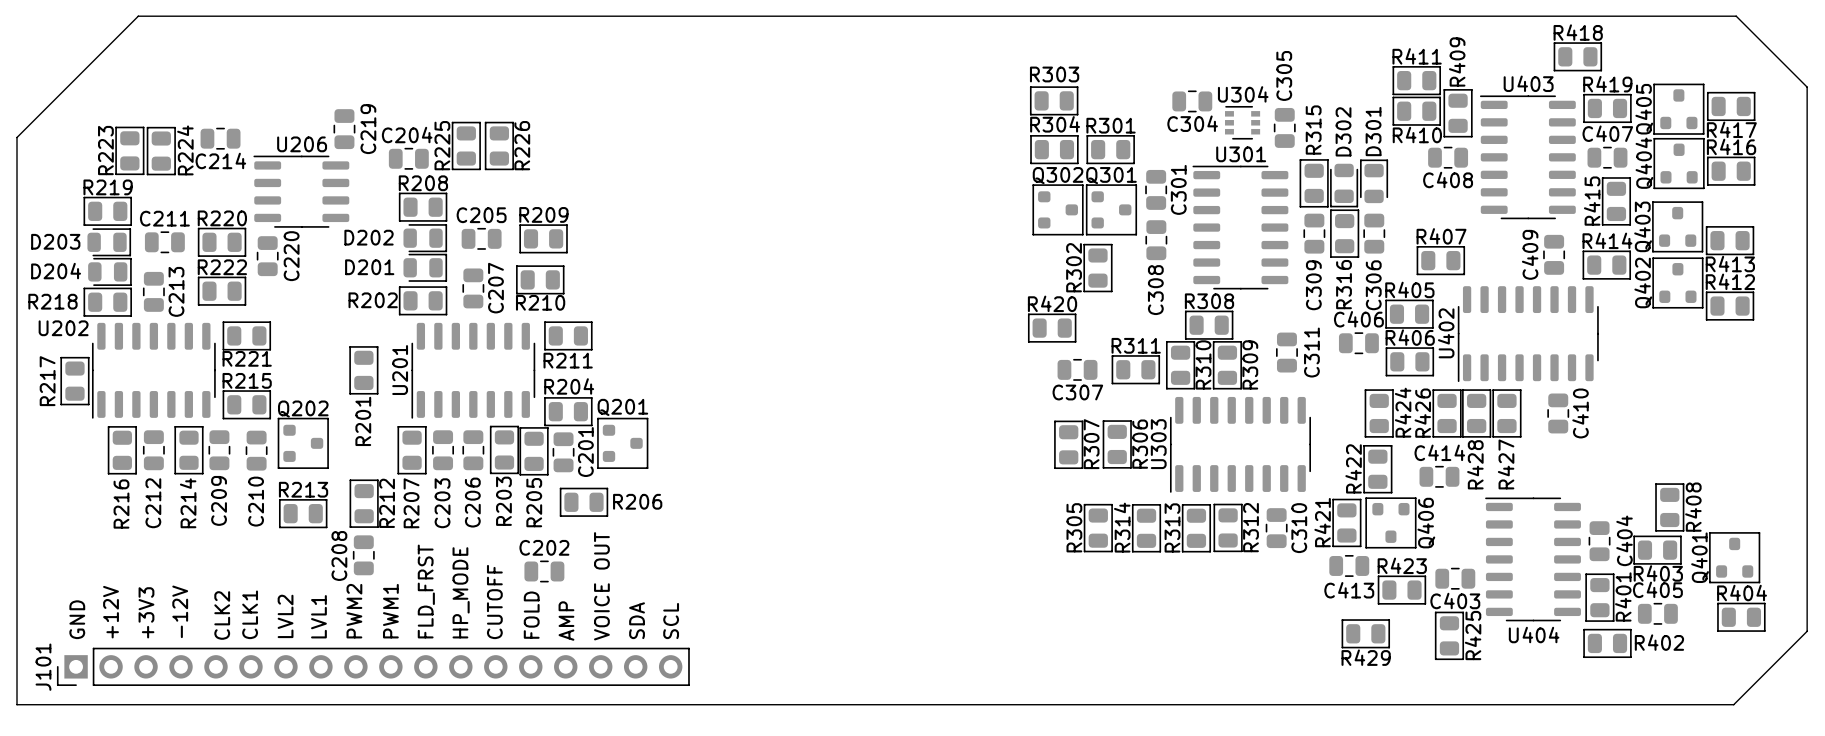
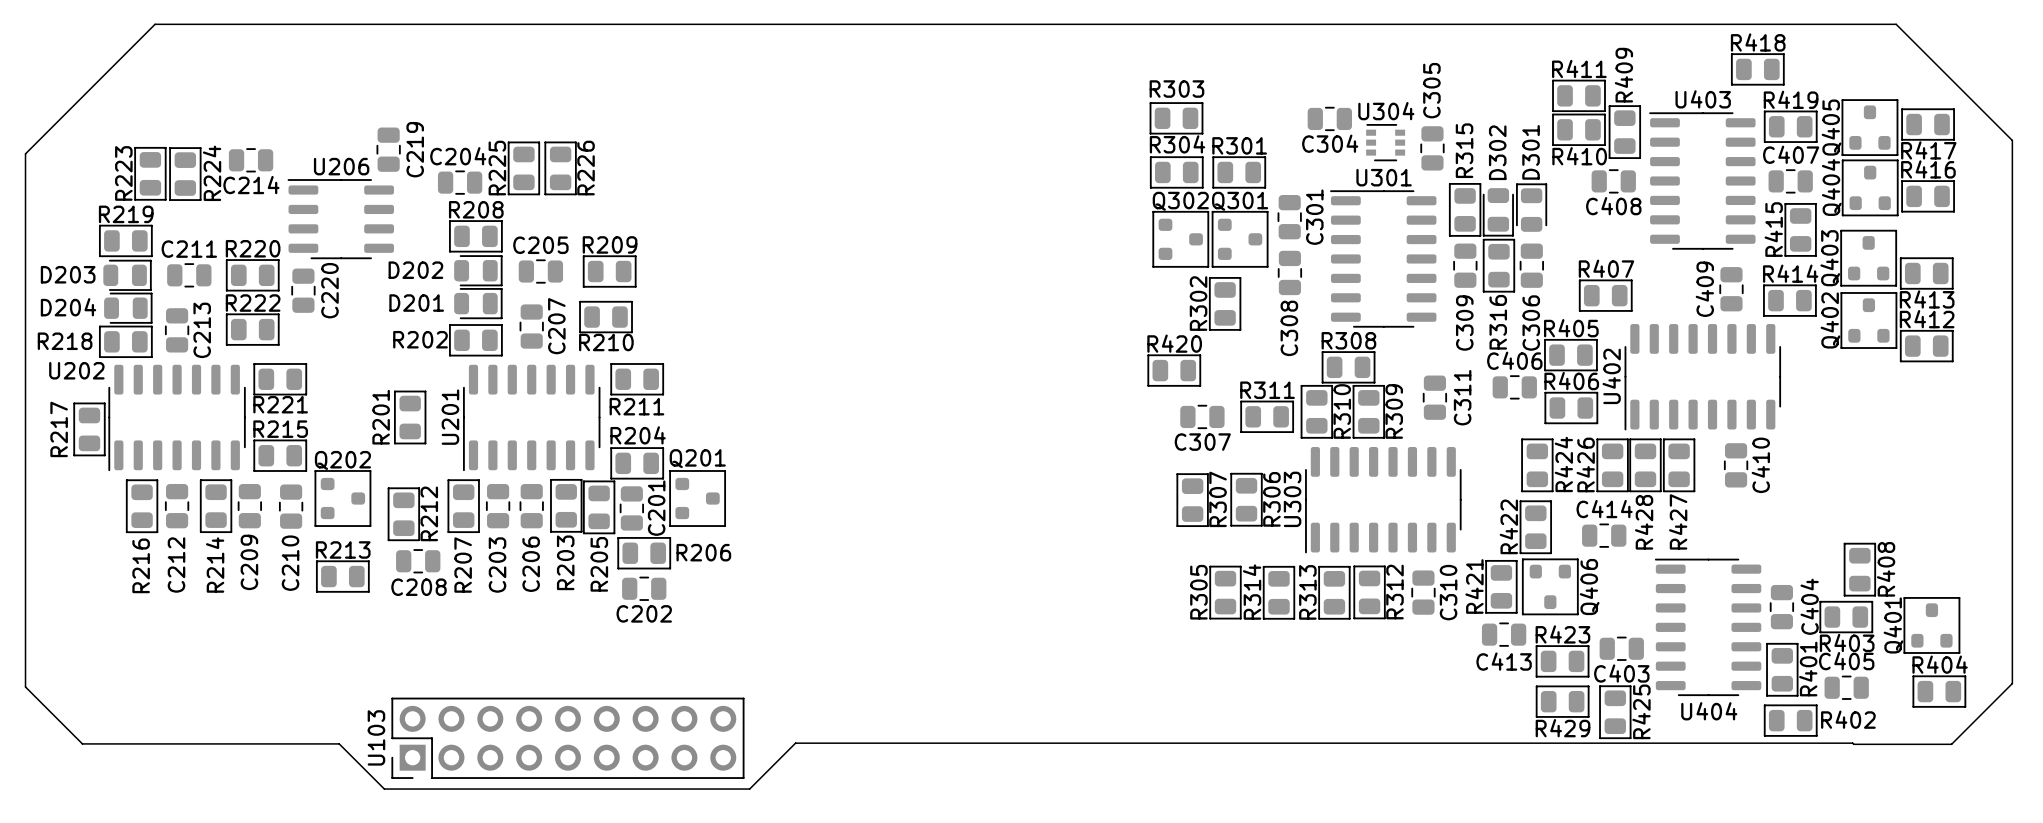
board edge: (138, 16) (17, 137) (17, 704) (1733, 704) (1807, 631) (1807, 610) -> (159, 24) (155, 24) (25, 153) (25, 686) (82, 743) (339, 743) (384, 789) (749, 789) (795, 743) (1951, 744) (2012, 683)
board edge: (1702, 16) (1736, 16) (1807, 87) (1807, 120) -> (1896, 24) (2012, 140)
R201 name position: R201 (363, 421) -> R201 (381, 417)
R206 position: (583, 502) -> (644, 553)
R212 position: (364, 503) -> (403, 514)
C202 name position: C202 (544, 547) -> C202 (644, 613)
C208 name position: C208 (339, 555) -> C208 (418, 587)
C208 rotation: 0° (363, 555) -> 90° clockwise (418, 561)
C208 position: (363, 555) -> (418, 561)
C202 position: (544, 571) -> (644, 588)
text: VOICE OUT (601, 586) -> none
text: FLD_FRST (426, 591) -> none
text: HP_MODE (461, 592) -> none
text: CUTOFF (494, 602) -> none
text: -12V (180, 611) -> none
text: PWM2 (354, 611) -> none
text: PWM1 (390, 611) -> none
text: +12V (111, 612) -> none
text: +3V3 (146, 612) -> none
text: CLK1 (250, 614) -> none
text: CLK2 (222, 615) -> none
text: FOLD (531, 615) -> none
text: LVL2 (285, 616) -> none
text: LVL1 (318, 616) -> none
text: GND (77, 619) -> none
text: SDA (637, 620) -> none
text: AMP (566, 621) -> none
text: SCL (671, 621) -> none
R429 position: (1365, 633) -> (1562, 701)
U103: none -> (567, 738)
J101: (373, 666) -> none

